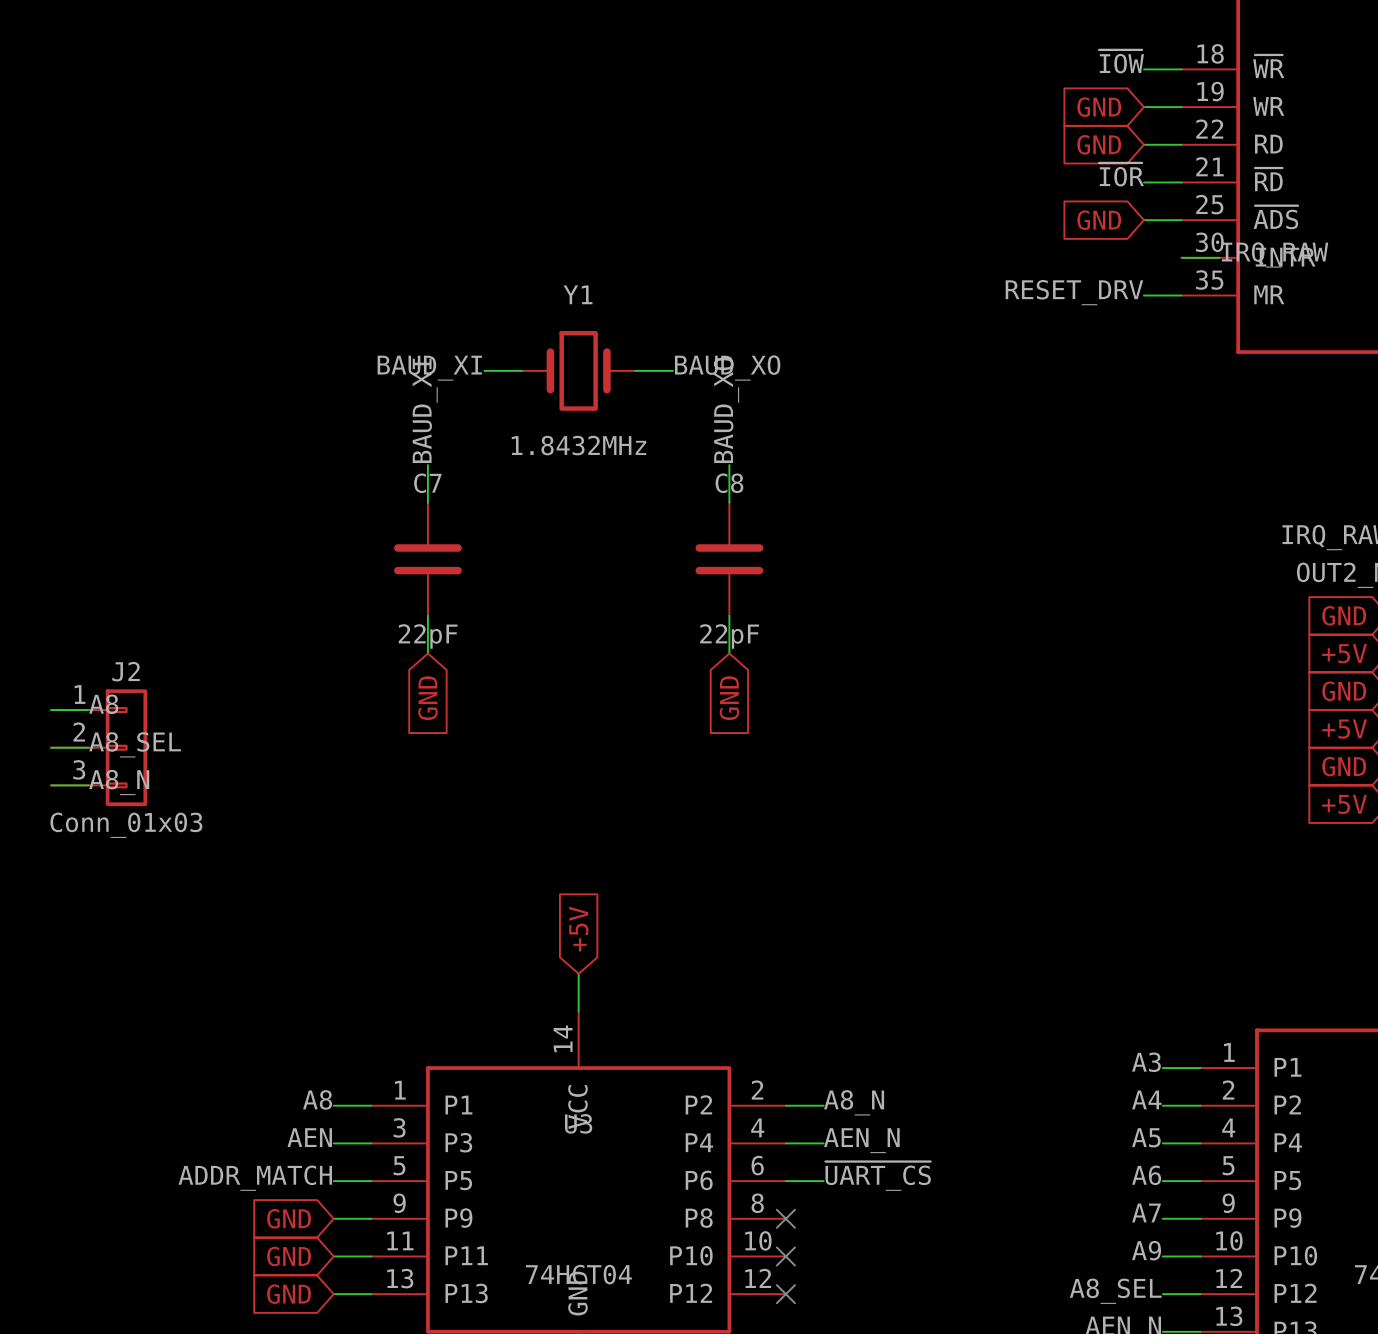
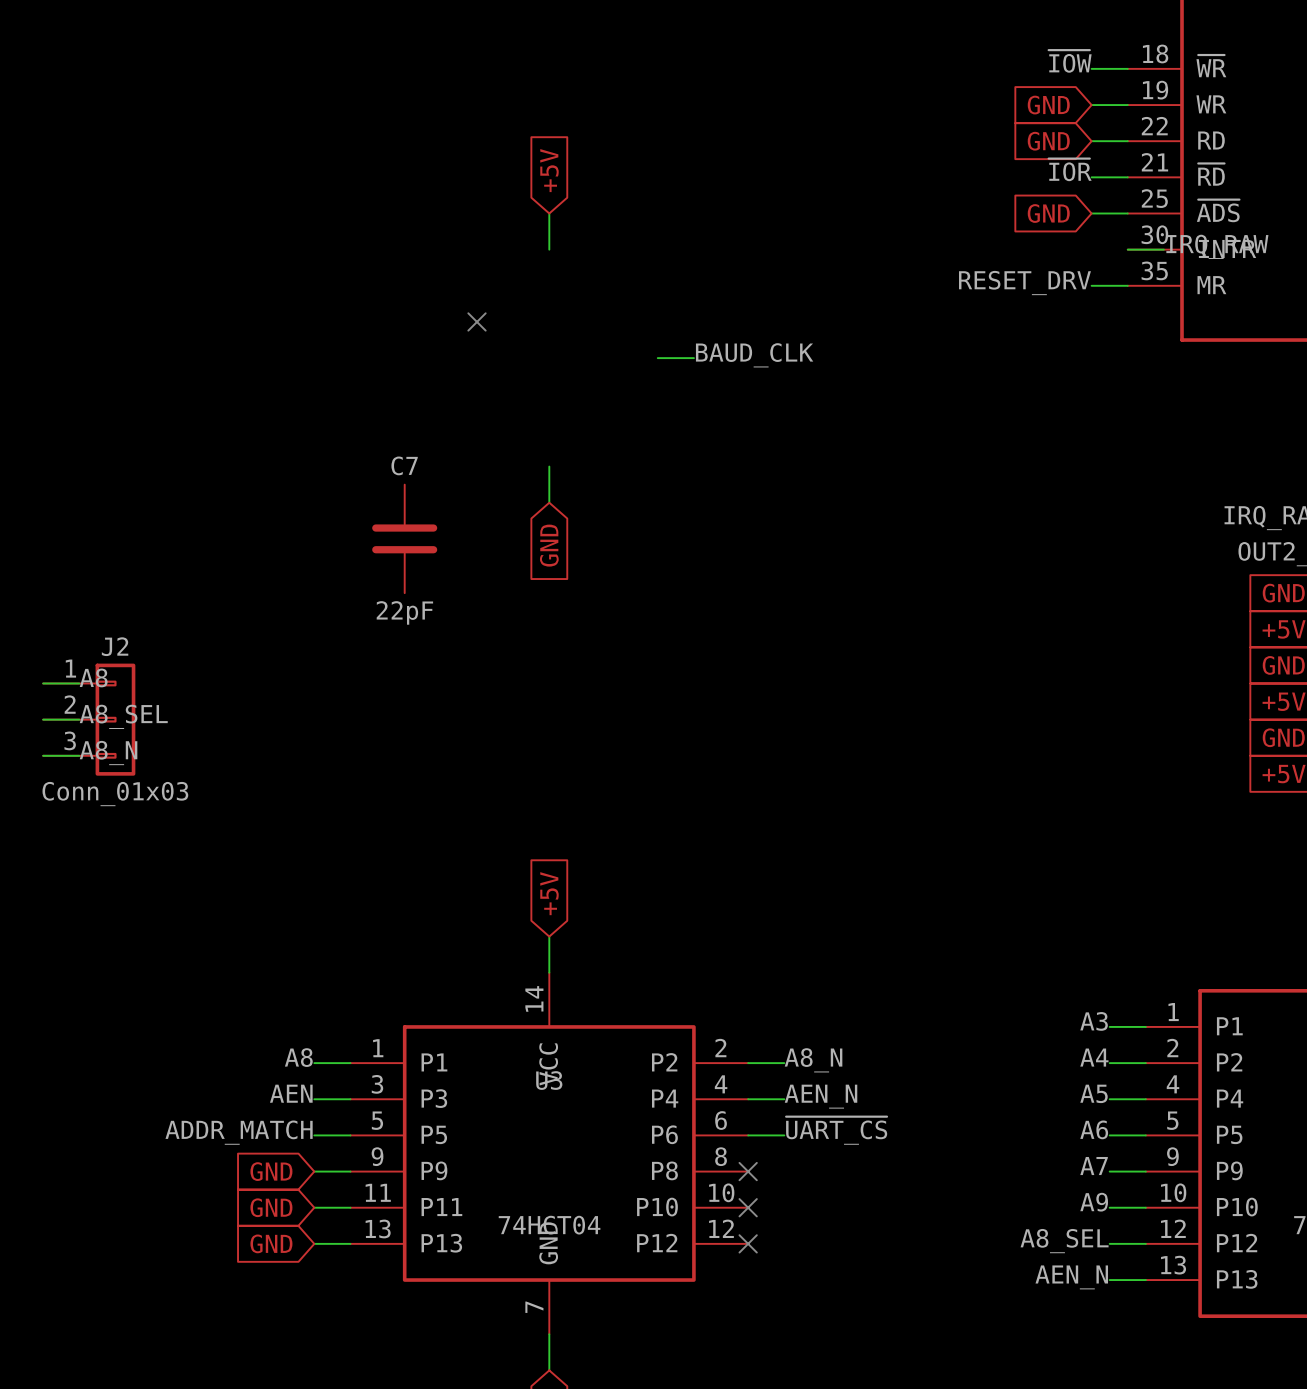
global label: none -> +5V (549, 170)
no-connect mark: none -> (477, 321)
label: BAUD_XO (727, 367) -> none
label: none -> BAUD_CLK (754, 355)
label: BAUD_XI (429, 368) -> none
wire: (484, 370) (522, 370) -> none
Y1: 1.8432MHz (578, 370) -> none
wire: (635, 370) (672, 370) -> (657, 358) (693, 358)
label: BAUD_XI (425, 410) -> none
label: BAUD_XO (726, 410) -> none
wire: (427, 465) (427, 502) -> (549, 466) (549, 502)
wire: (729, 465) (729, 502) -> (549, 213) (549, 249)
C8: 22pF (729, 559) -> none
global label: none -> GND (549, 545)
wire: (427, 615) (427, 653) -> none
wire: (729, 615) (729, 653) -> none
global label: GND (427, 698) -> none
global label: GND (729, 698) -> none

